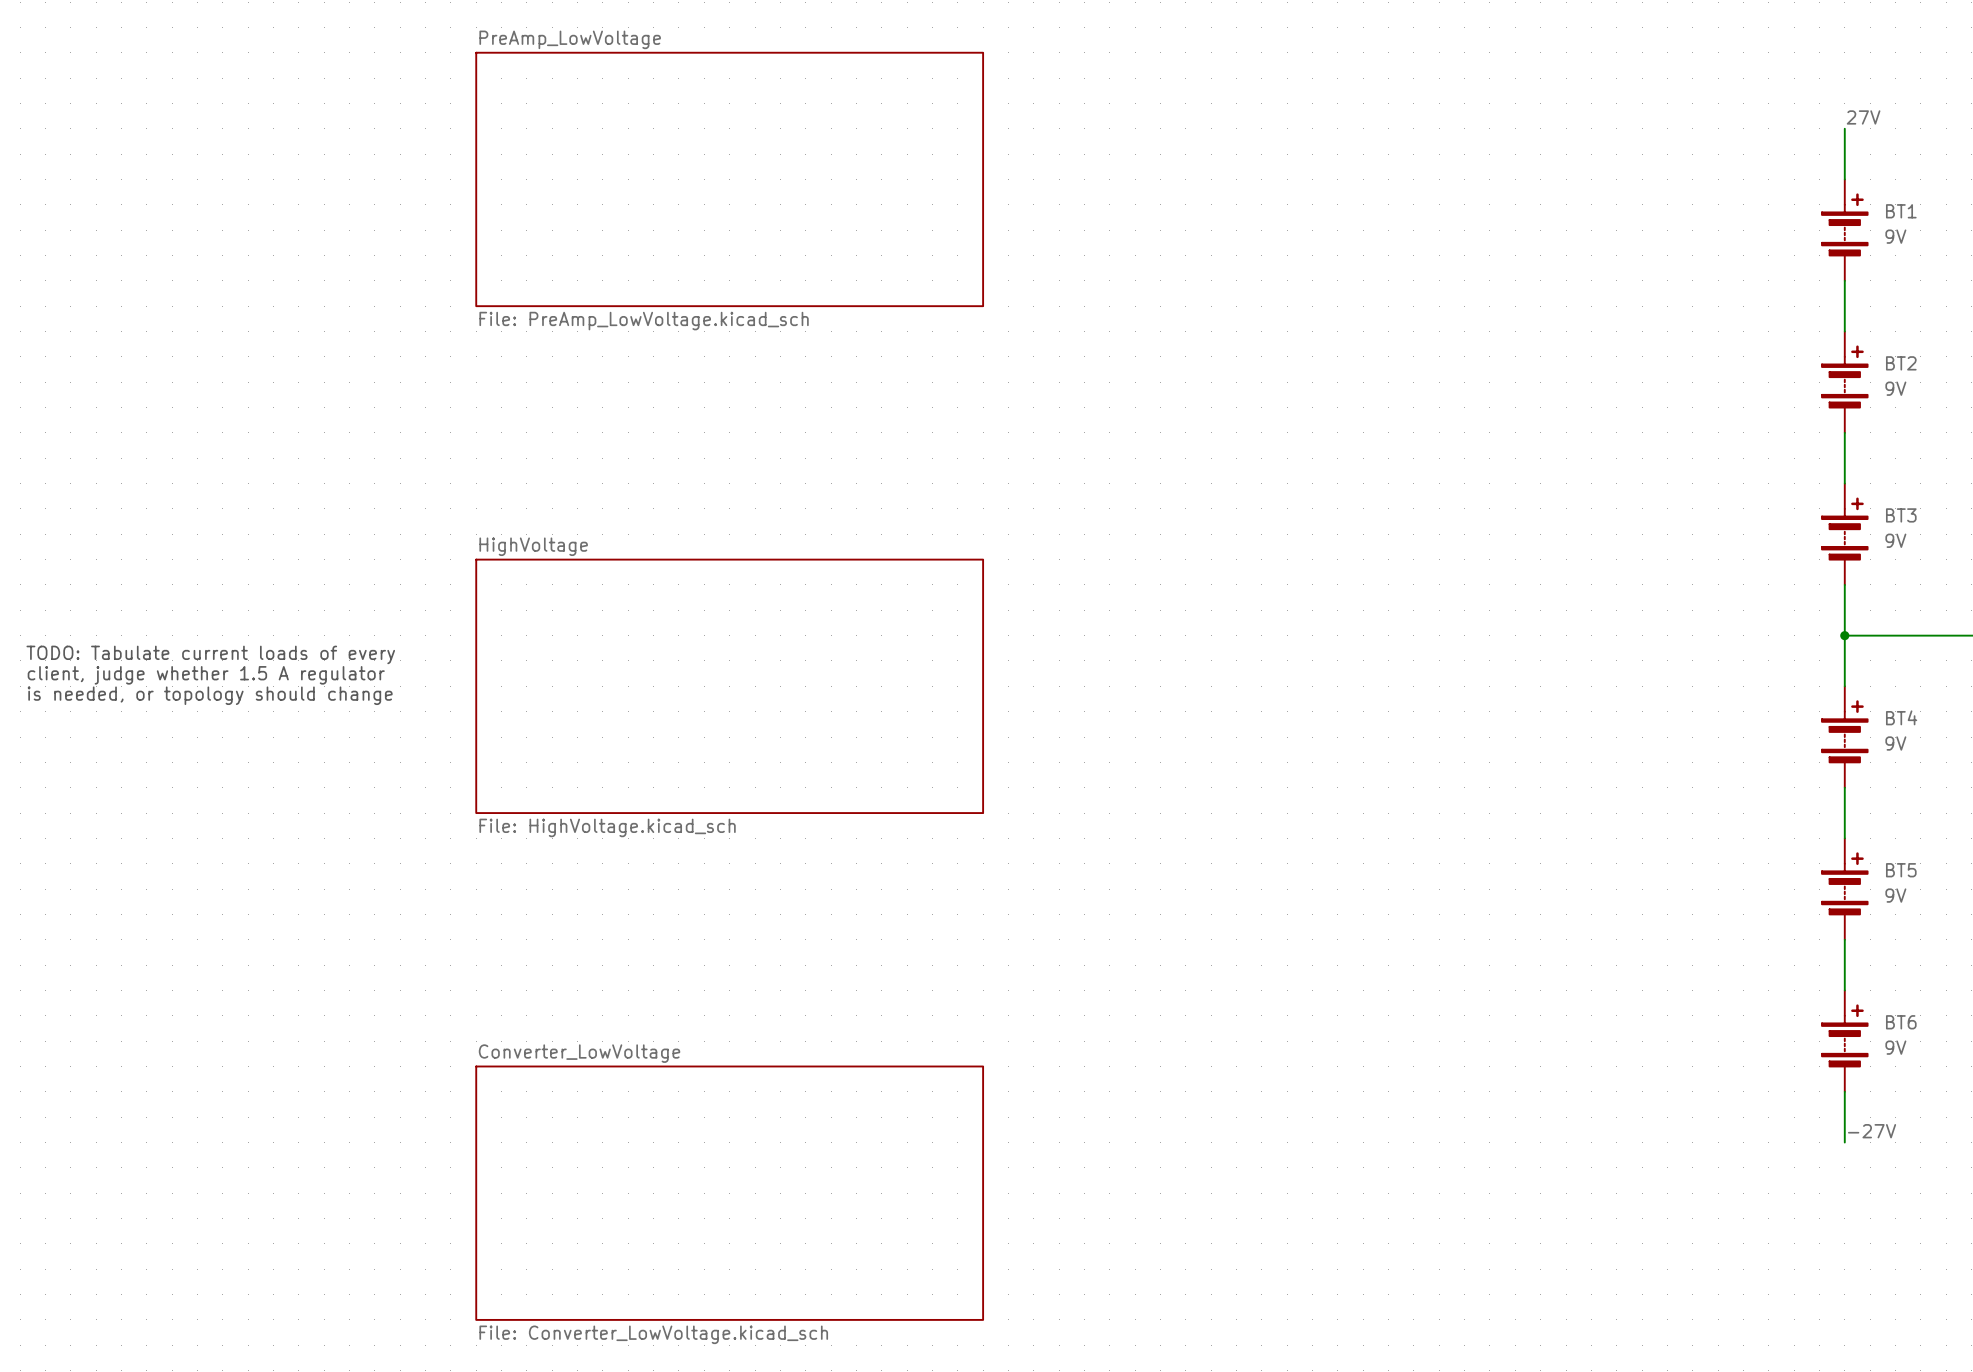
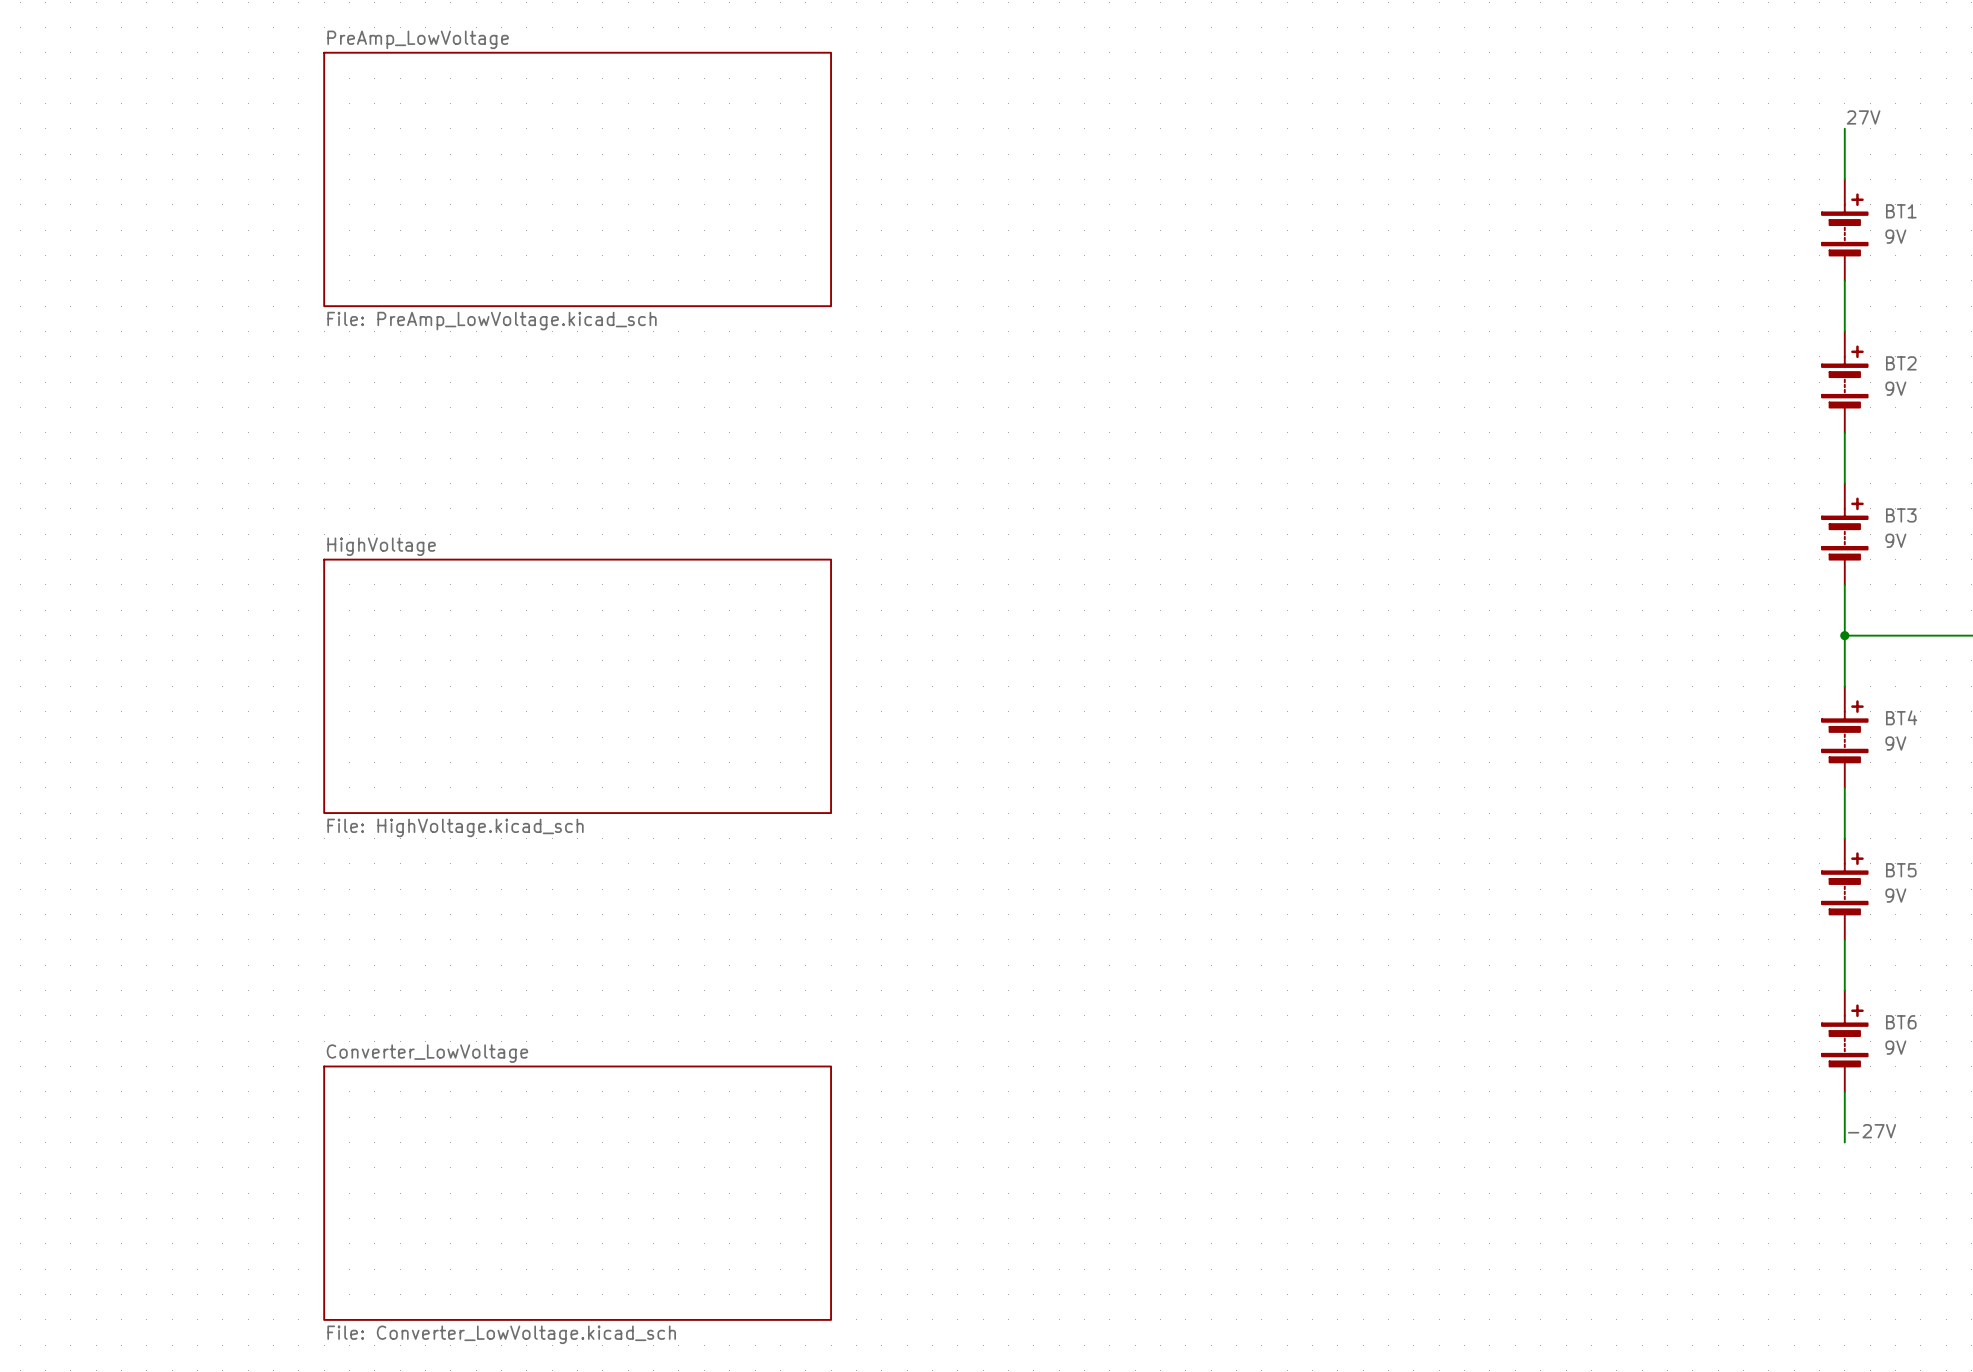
sheet PreAmp_LowVoltage position: (729, 179) -> (577, 179)
text: TODO: Tabulate current loads of every (210, 654) -> none
text: client, judge whether 1.5 A regulator (206, 675) -> none
sheet HighVoltage position: (729, 686) -> (577, 686)
text: is needed, or topology should change (210, 695) -> none
sheet Converter_LowVoltage position: (729, 1193) -> (577, 1193)

